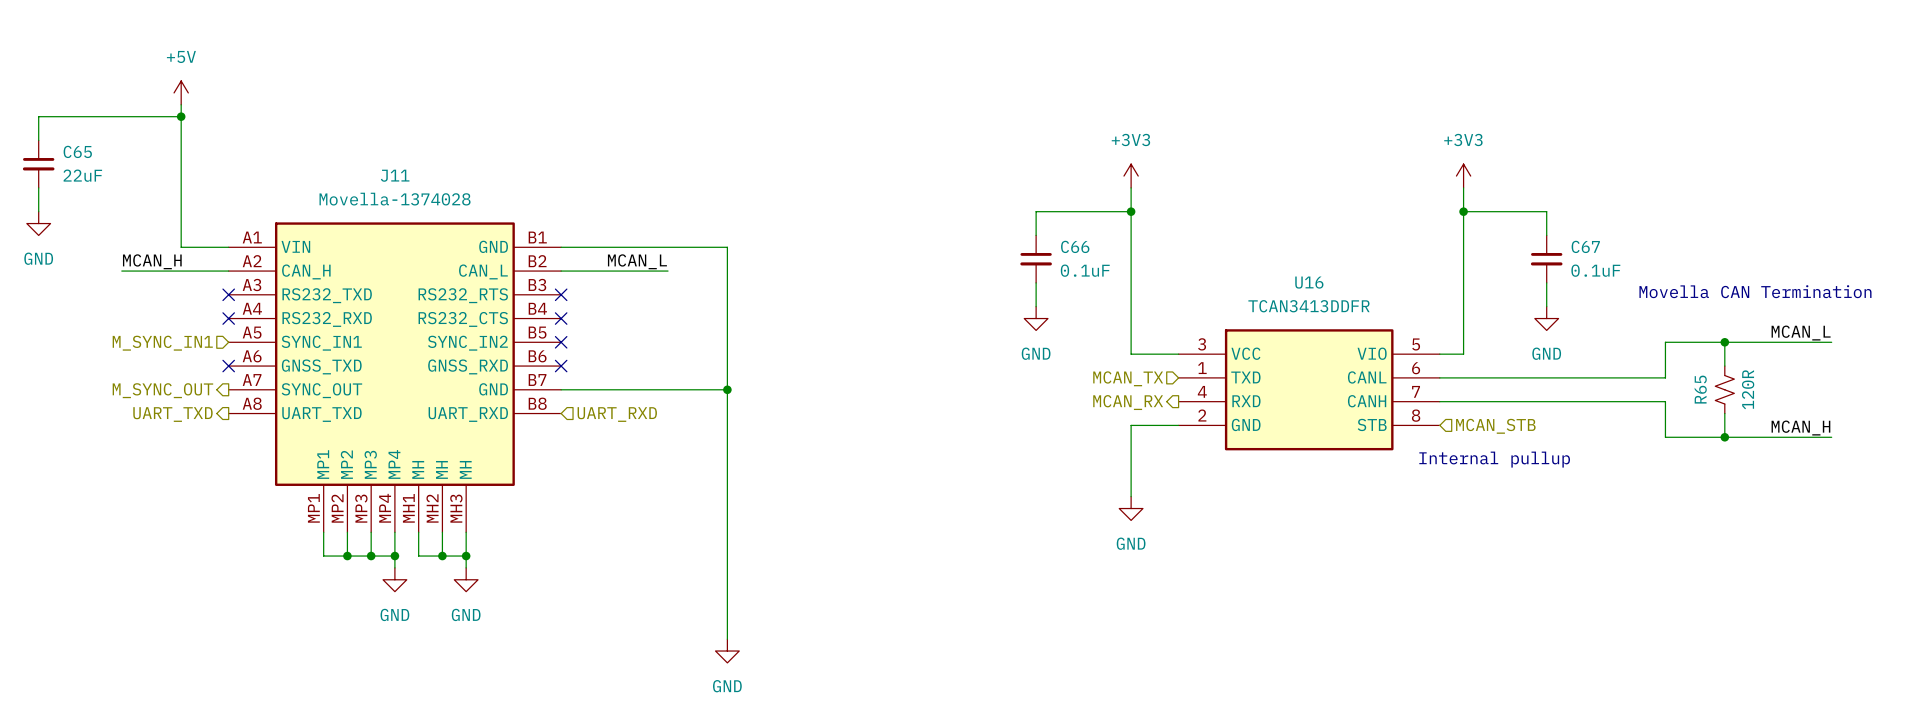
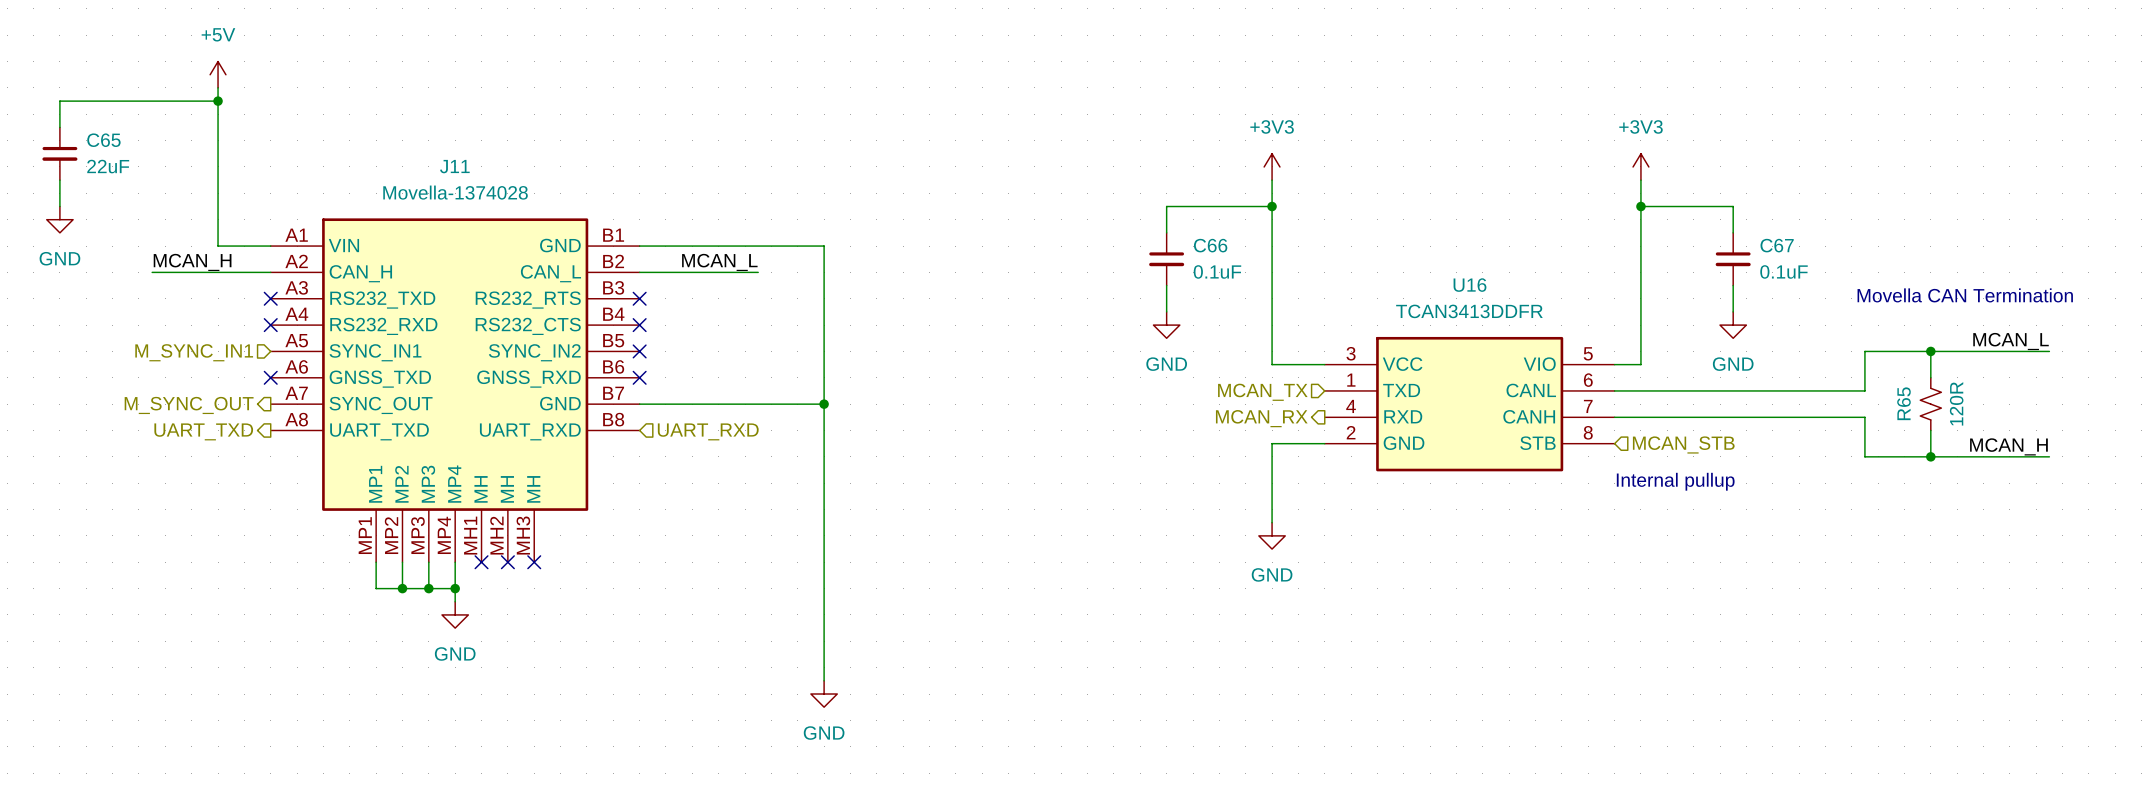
wire: (418, 532) (418, 556) (466, 556) -> none
no-connect mark: none -> (481, 562)
wire: (442, 532) (442, 556) -> none
no-connect mark: none -> (507, 562)
wire: (466, 532) (466, 567) -> none
no-connect mark: none -> (534, 562)
junction: (442, 556) -> none
junction: (466, 556) -> none
power symbol: GND (466, 579) -> none

